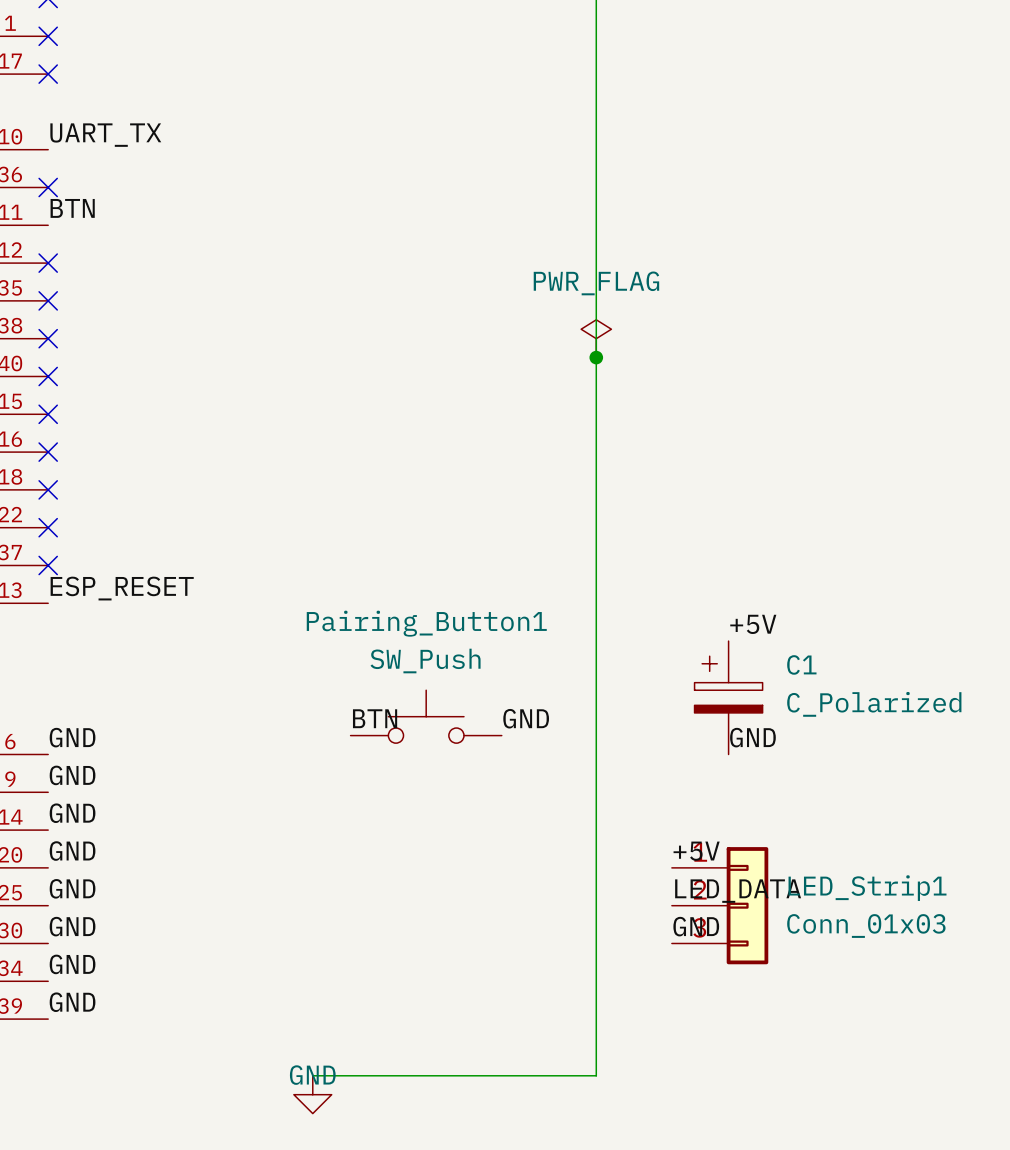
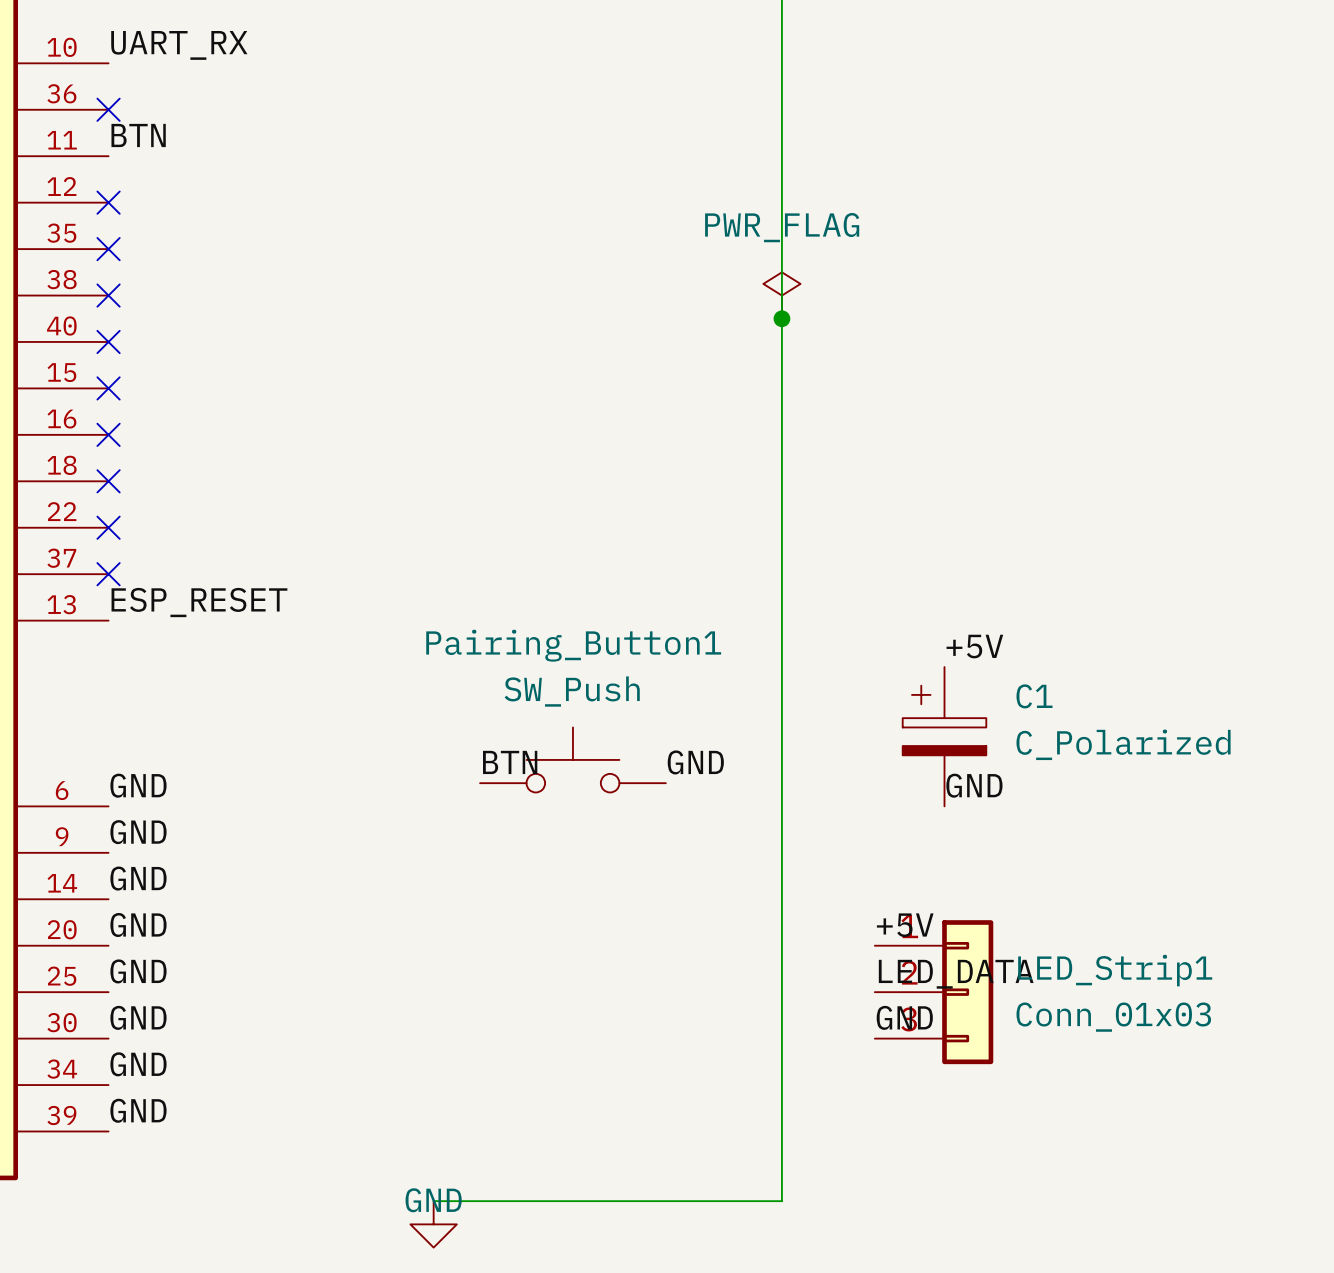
label: UART_TX (105, 135) -> UART_RX (179, 45)

